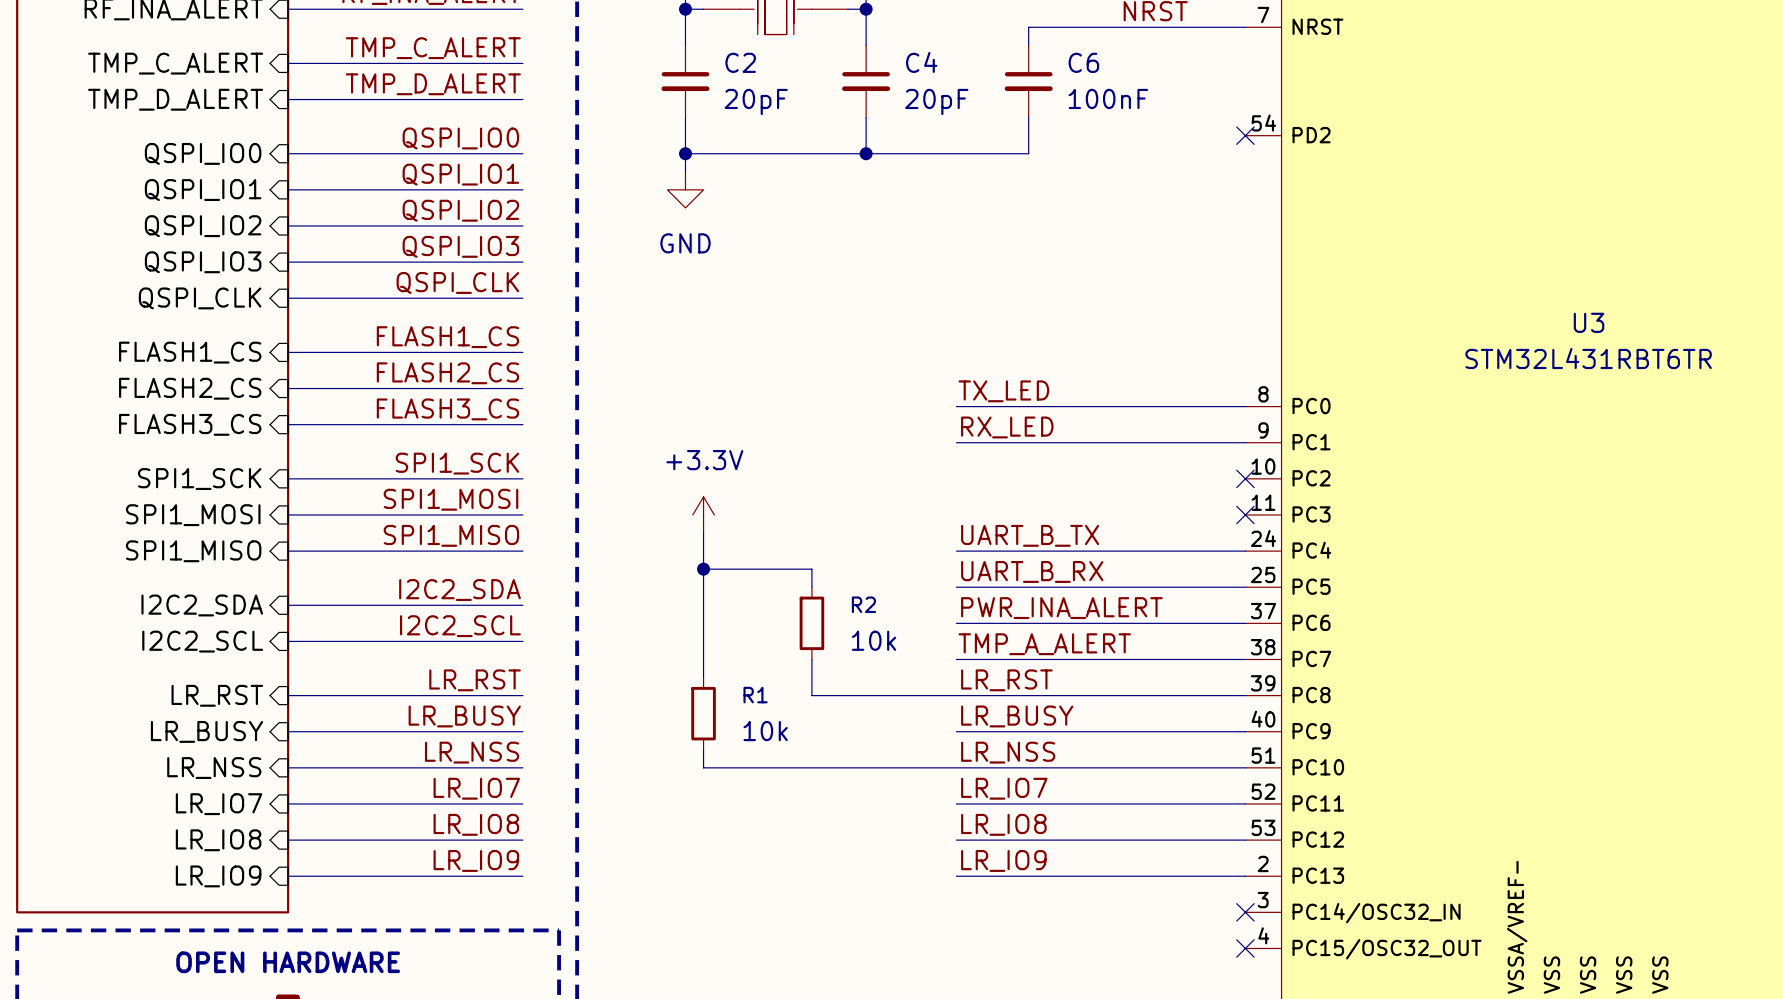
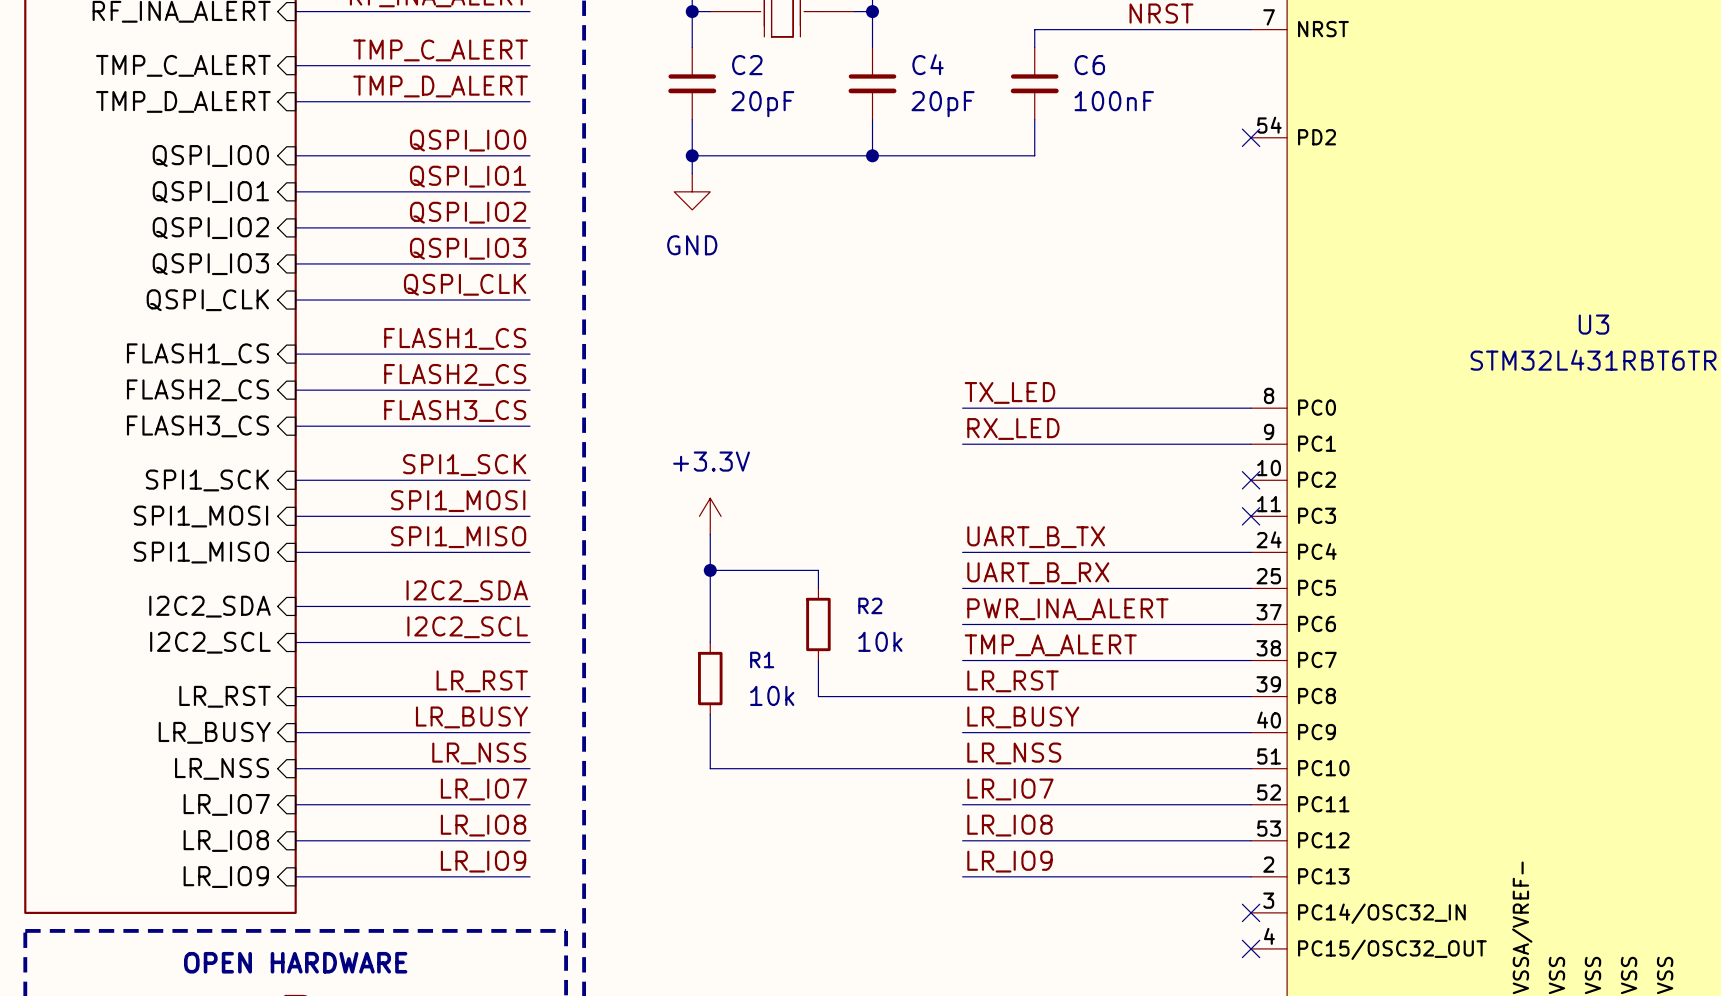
wire: (703, 641) (703, 677) -> (710, 714) (710, 750)
R1 position: (703, 713) -> (710, 678)

